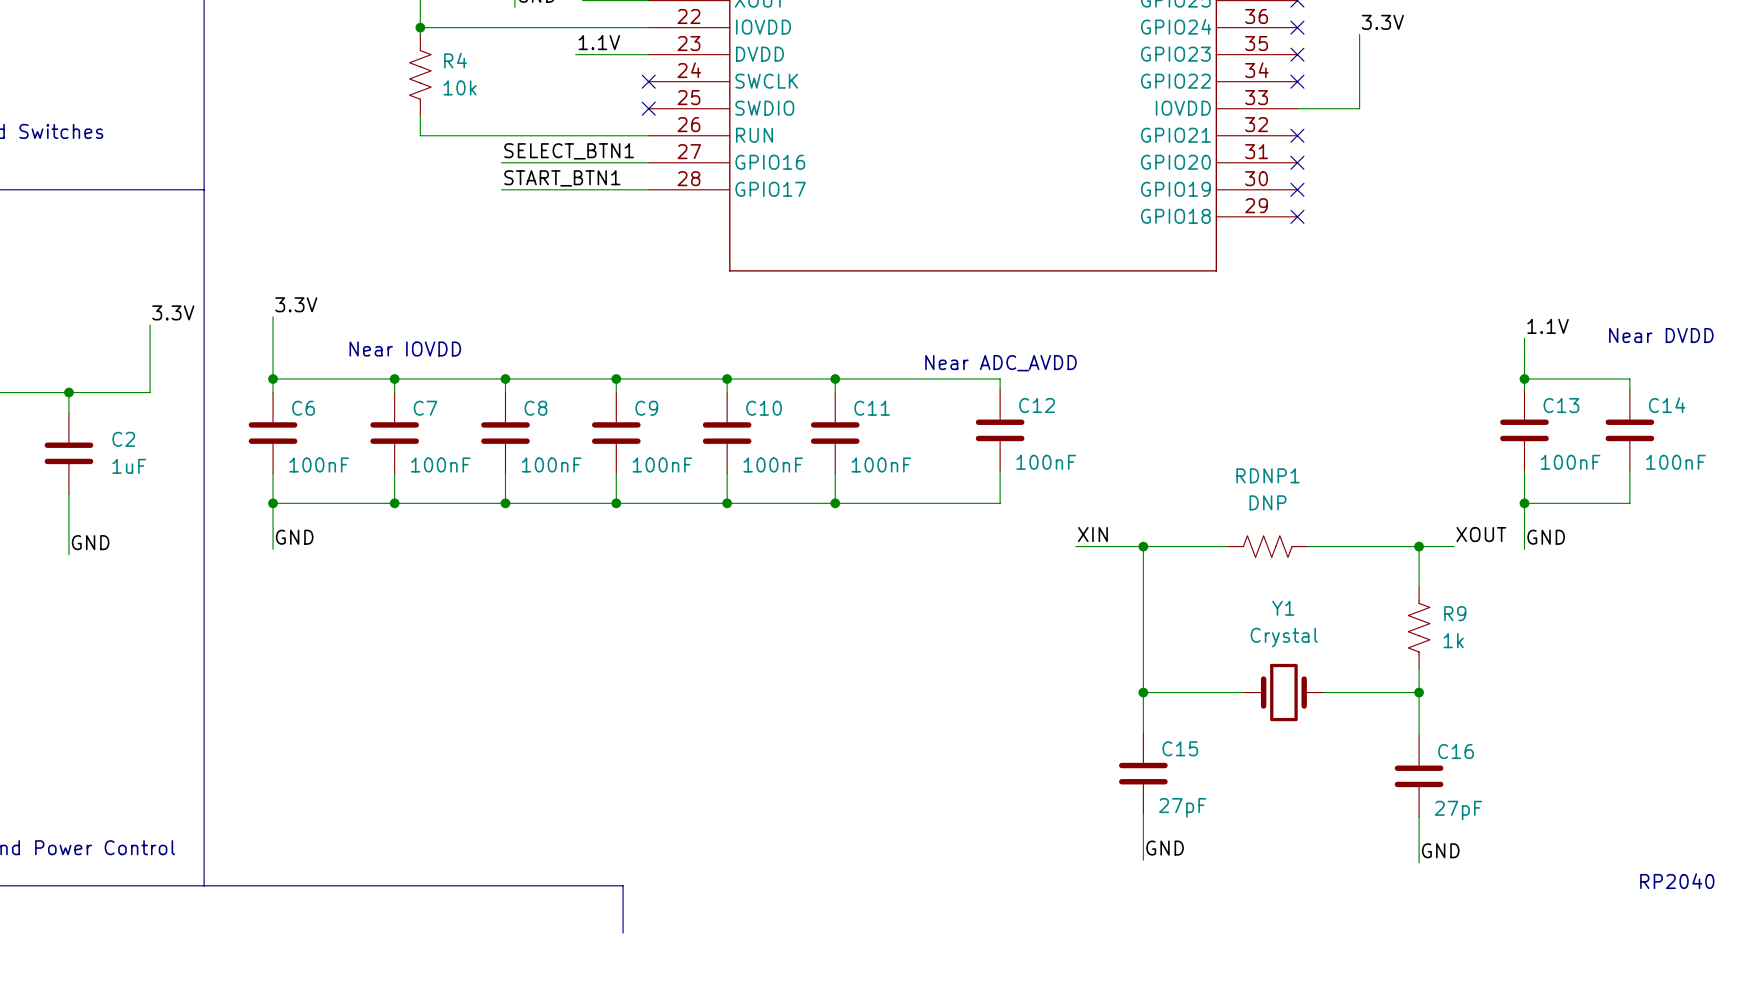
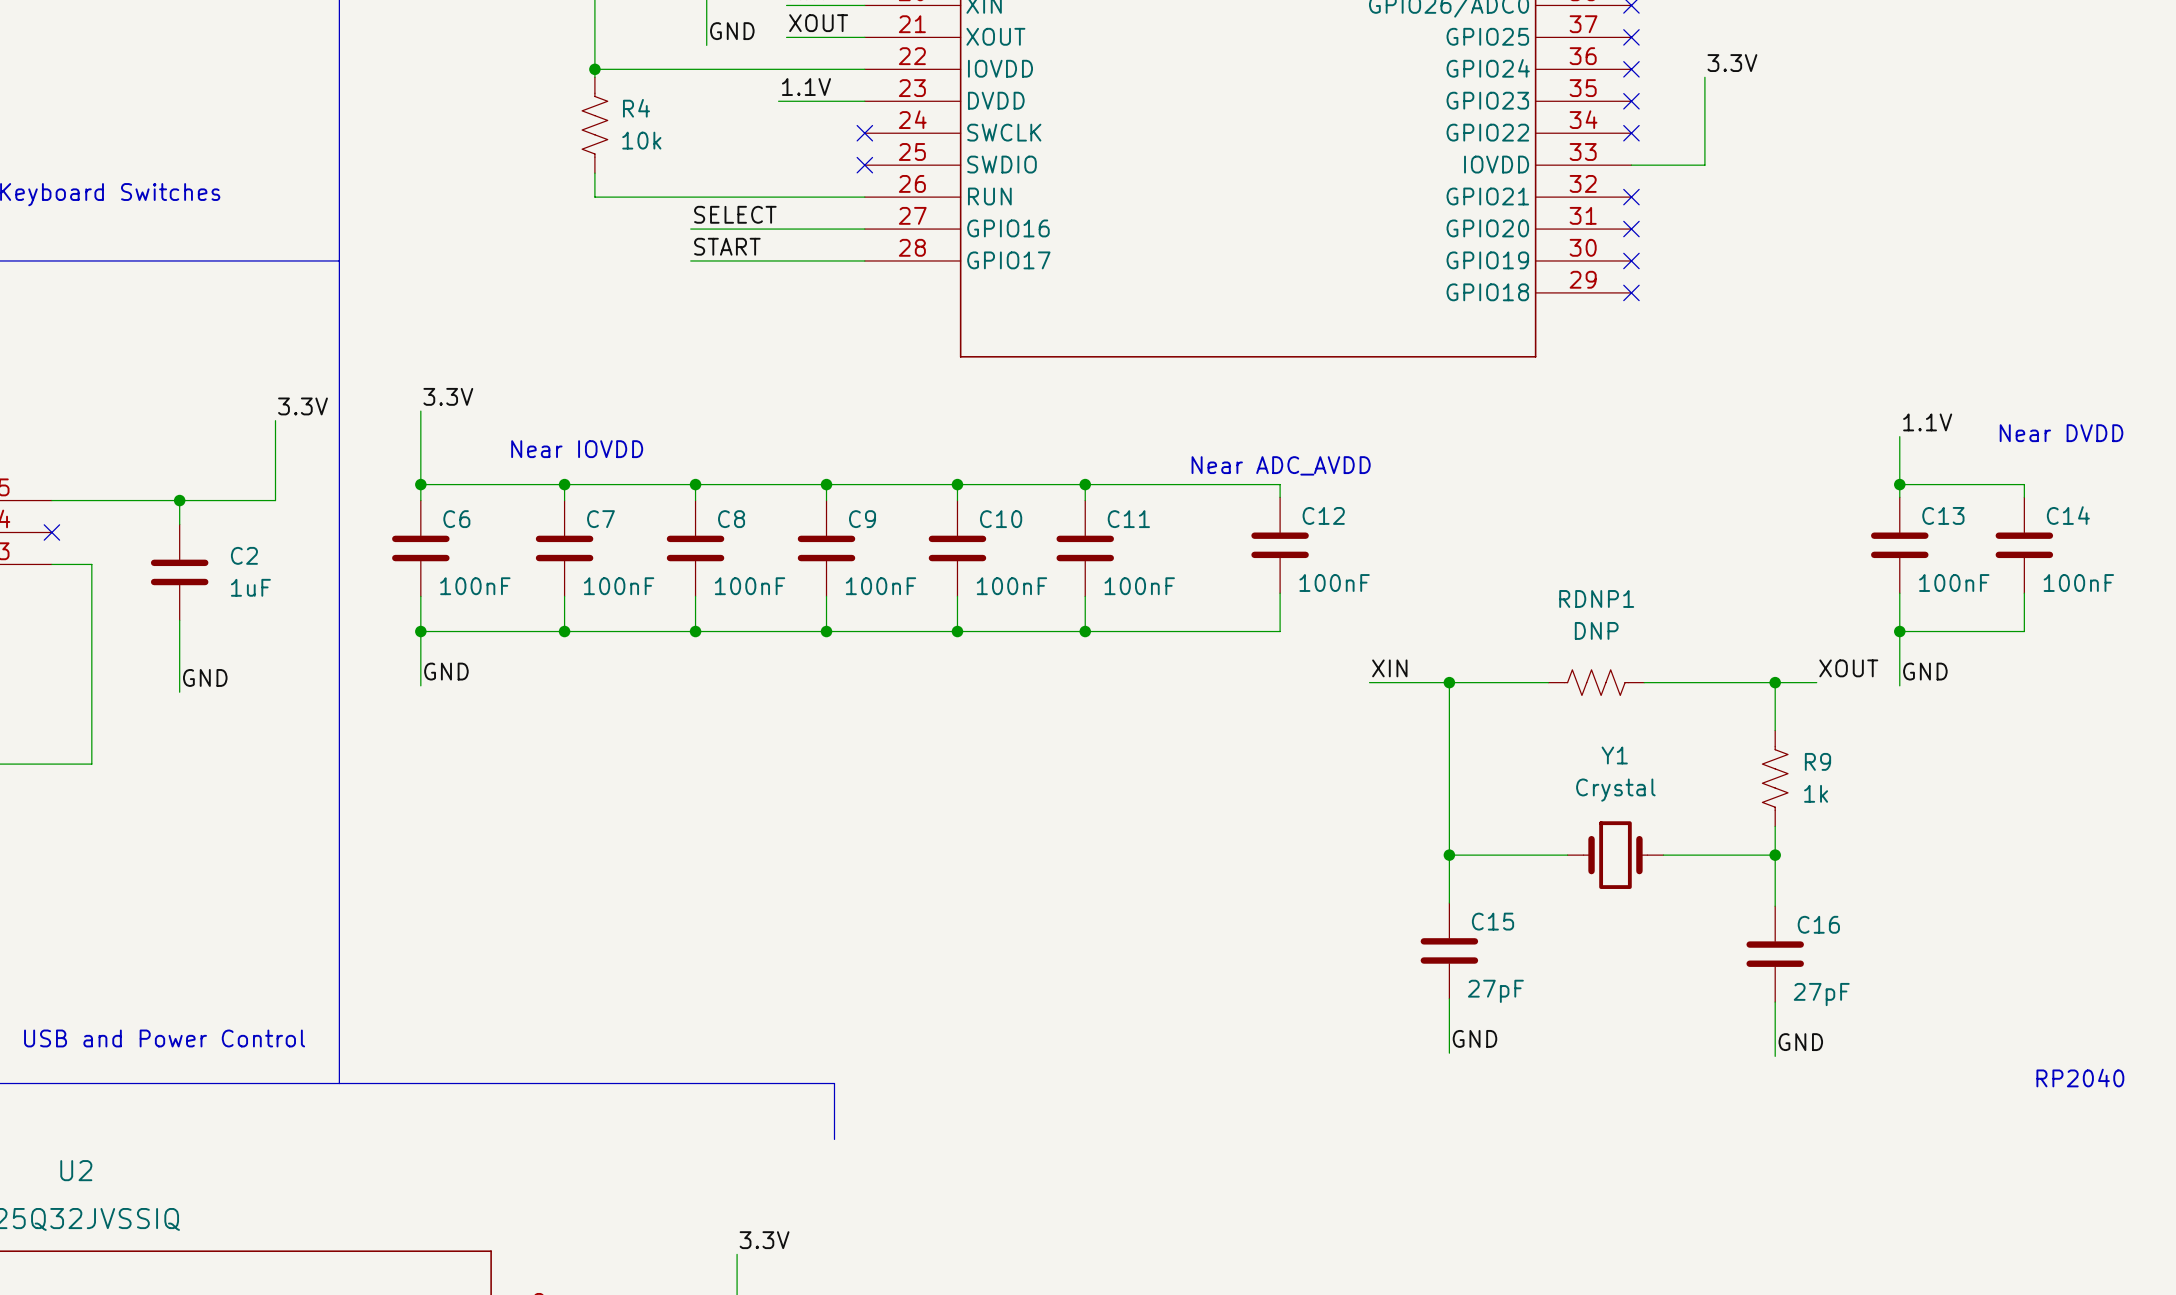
label: SELECT_BTN1 (569, 151) -> SELECT (735, 214)
label: START_BTN1 (562, 178) -> START (727, 246)

